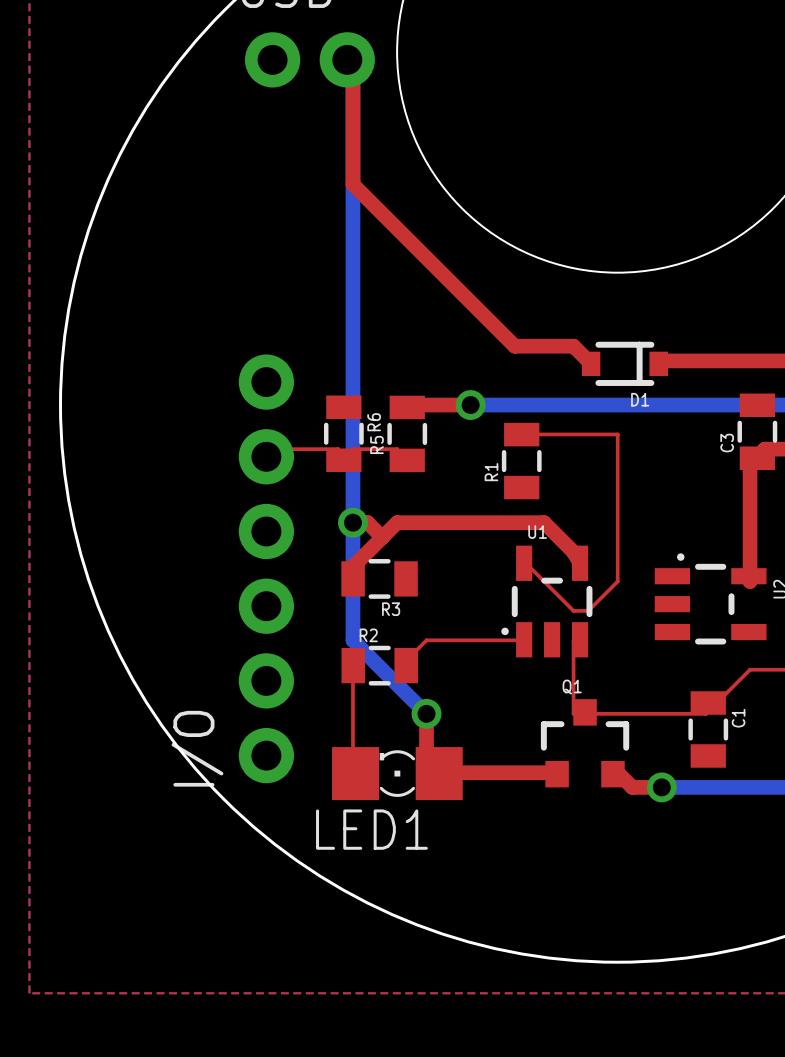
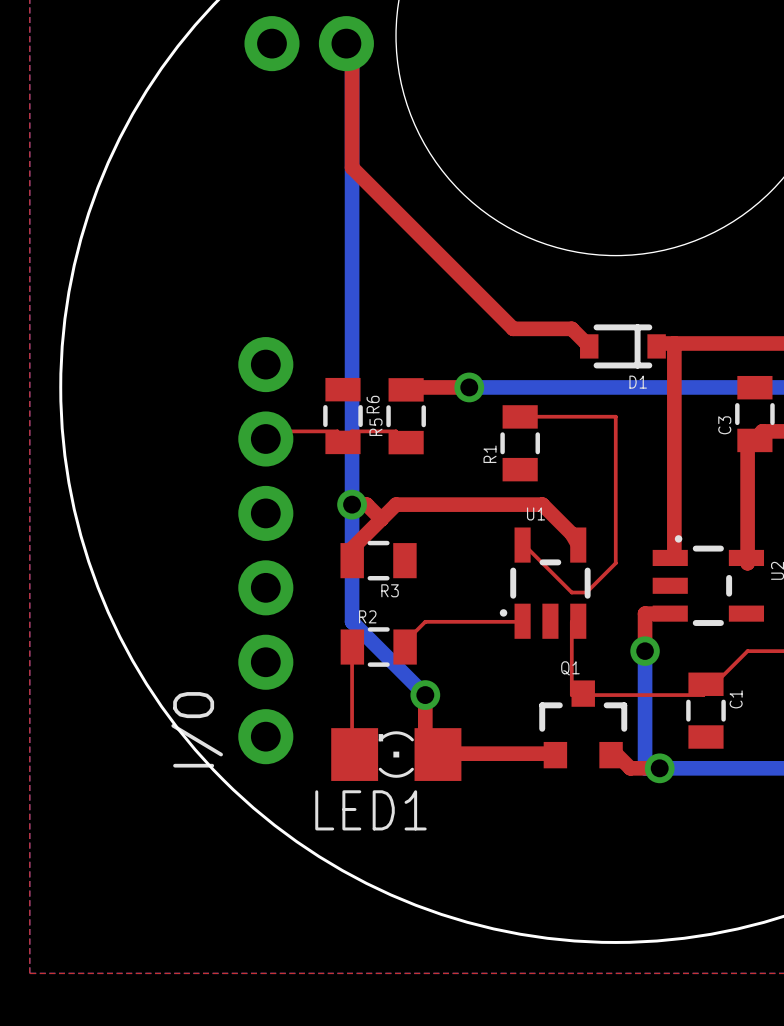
top track: none -> (674, 343) (674, 557) (670, 557)
top track: none -> (670, 613) (645, 613) (645, 651)
bottom track: none -> (645, 651) (645, 768) (659, 768)
via: none -> (645, 651)

